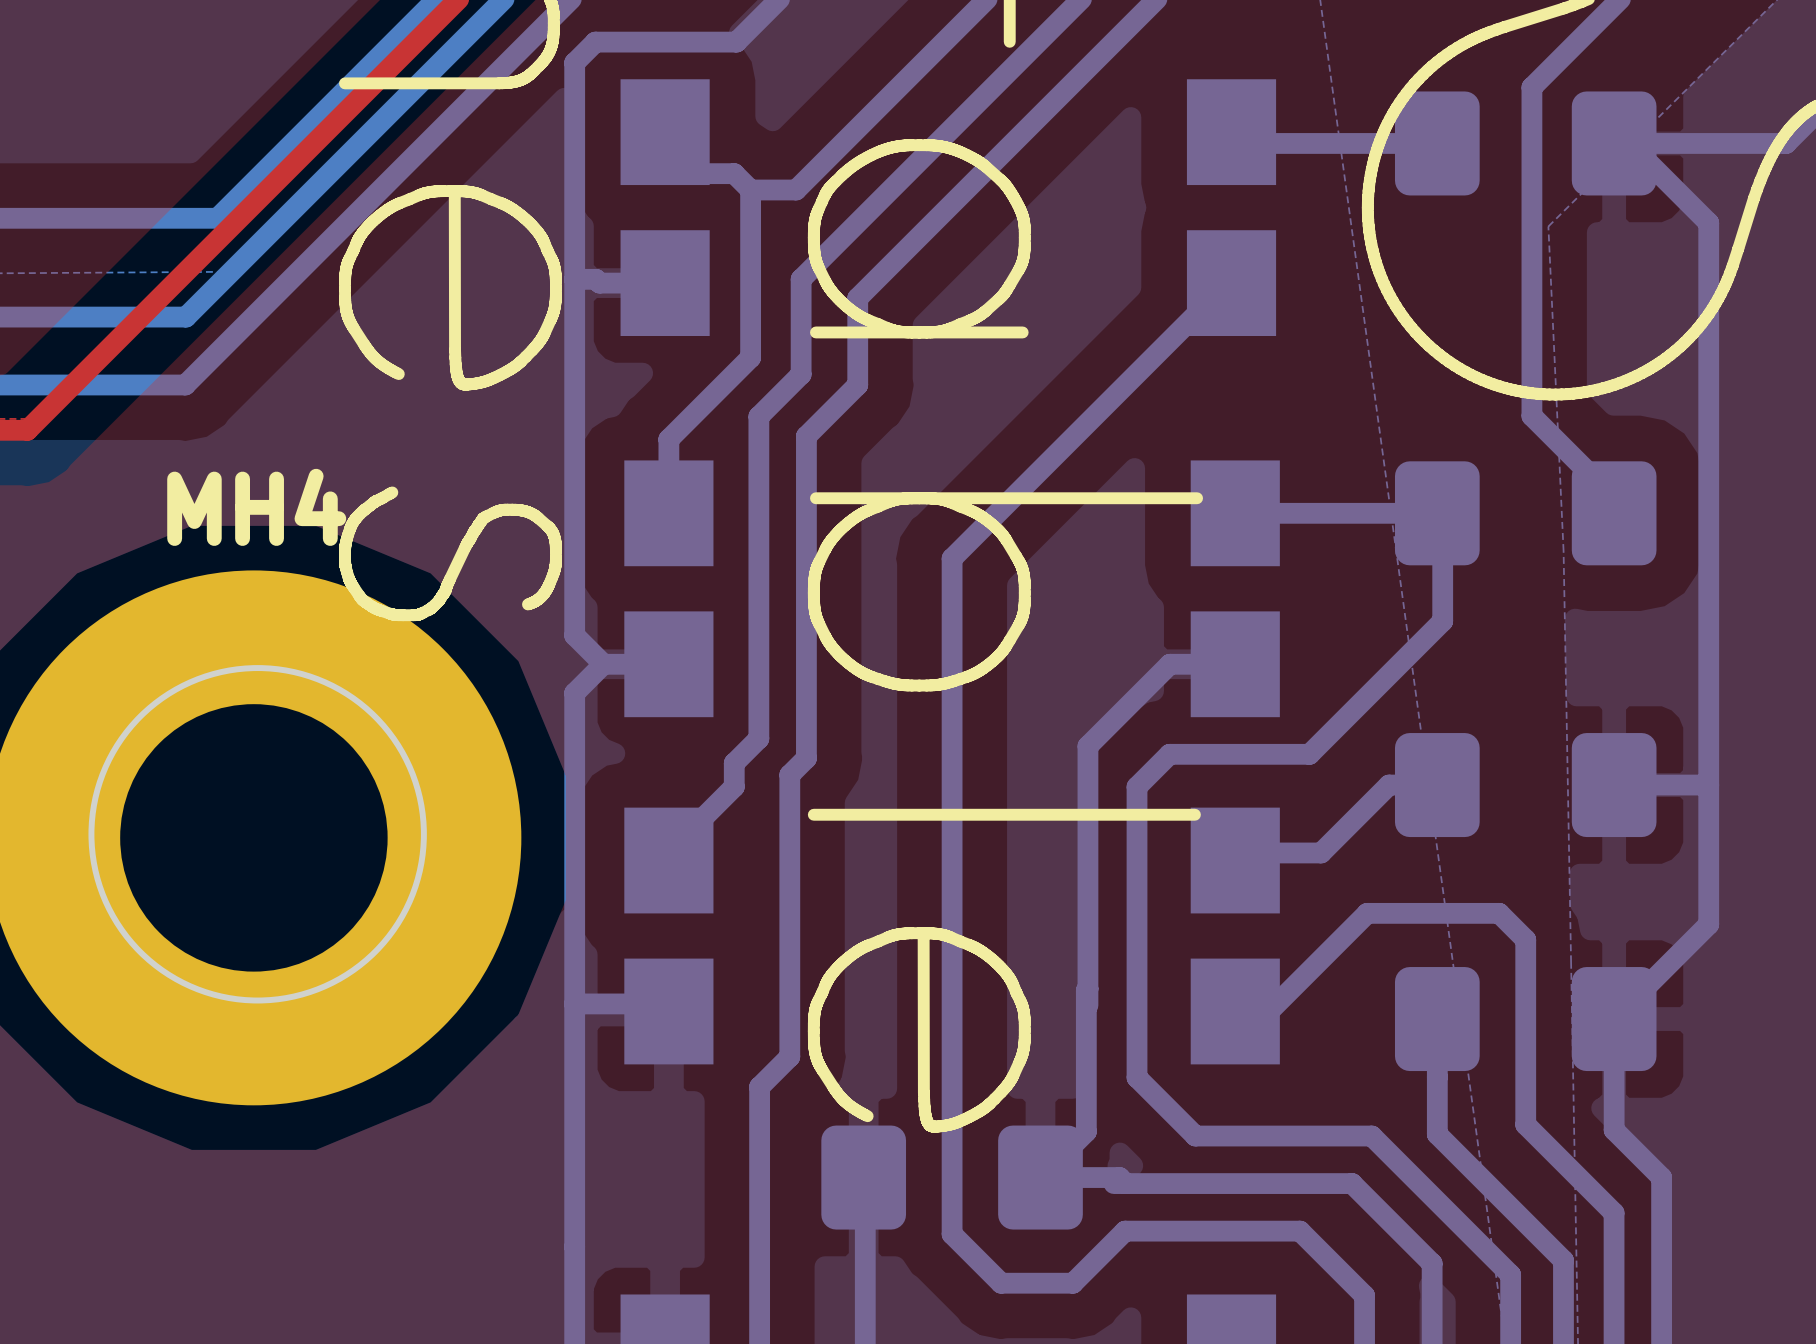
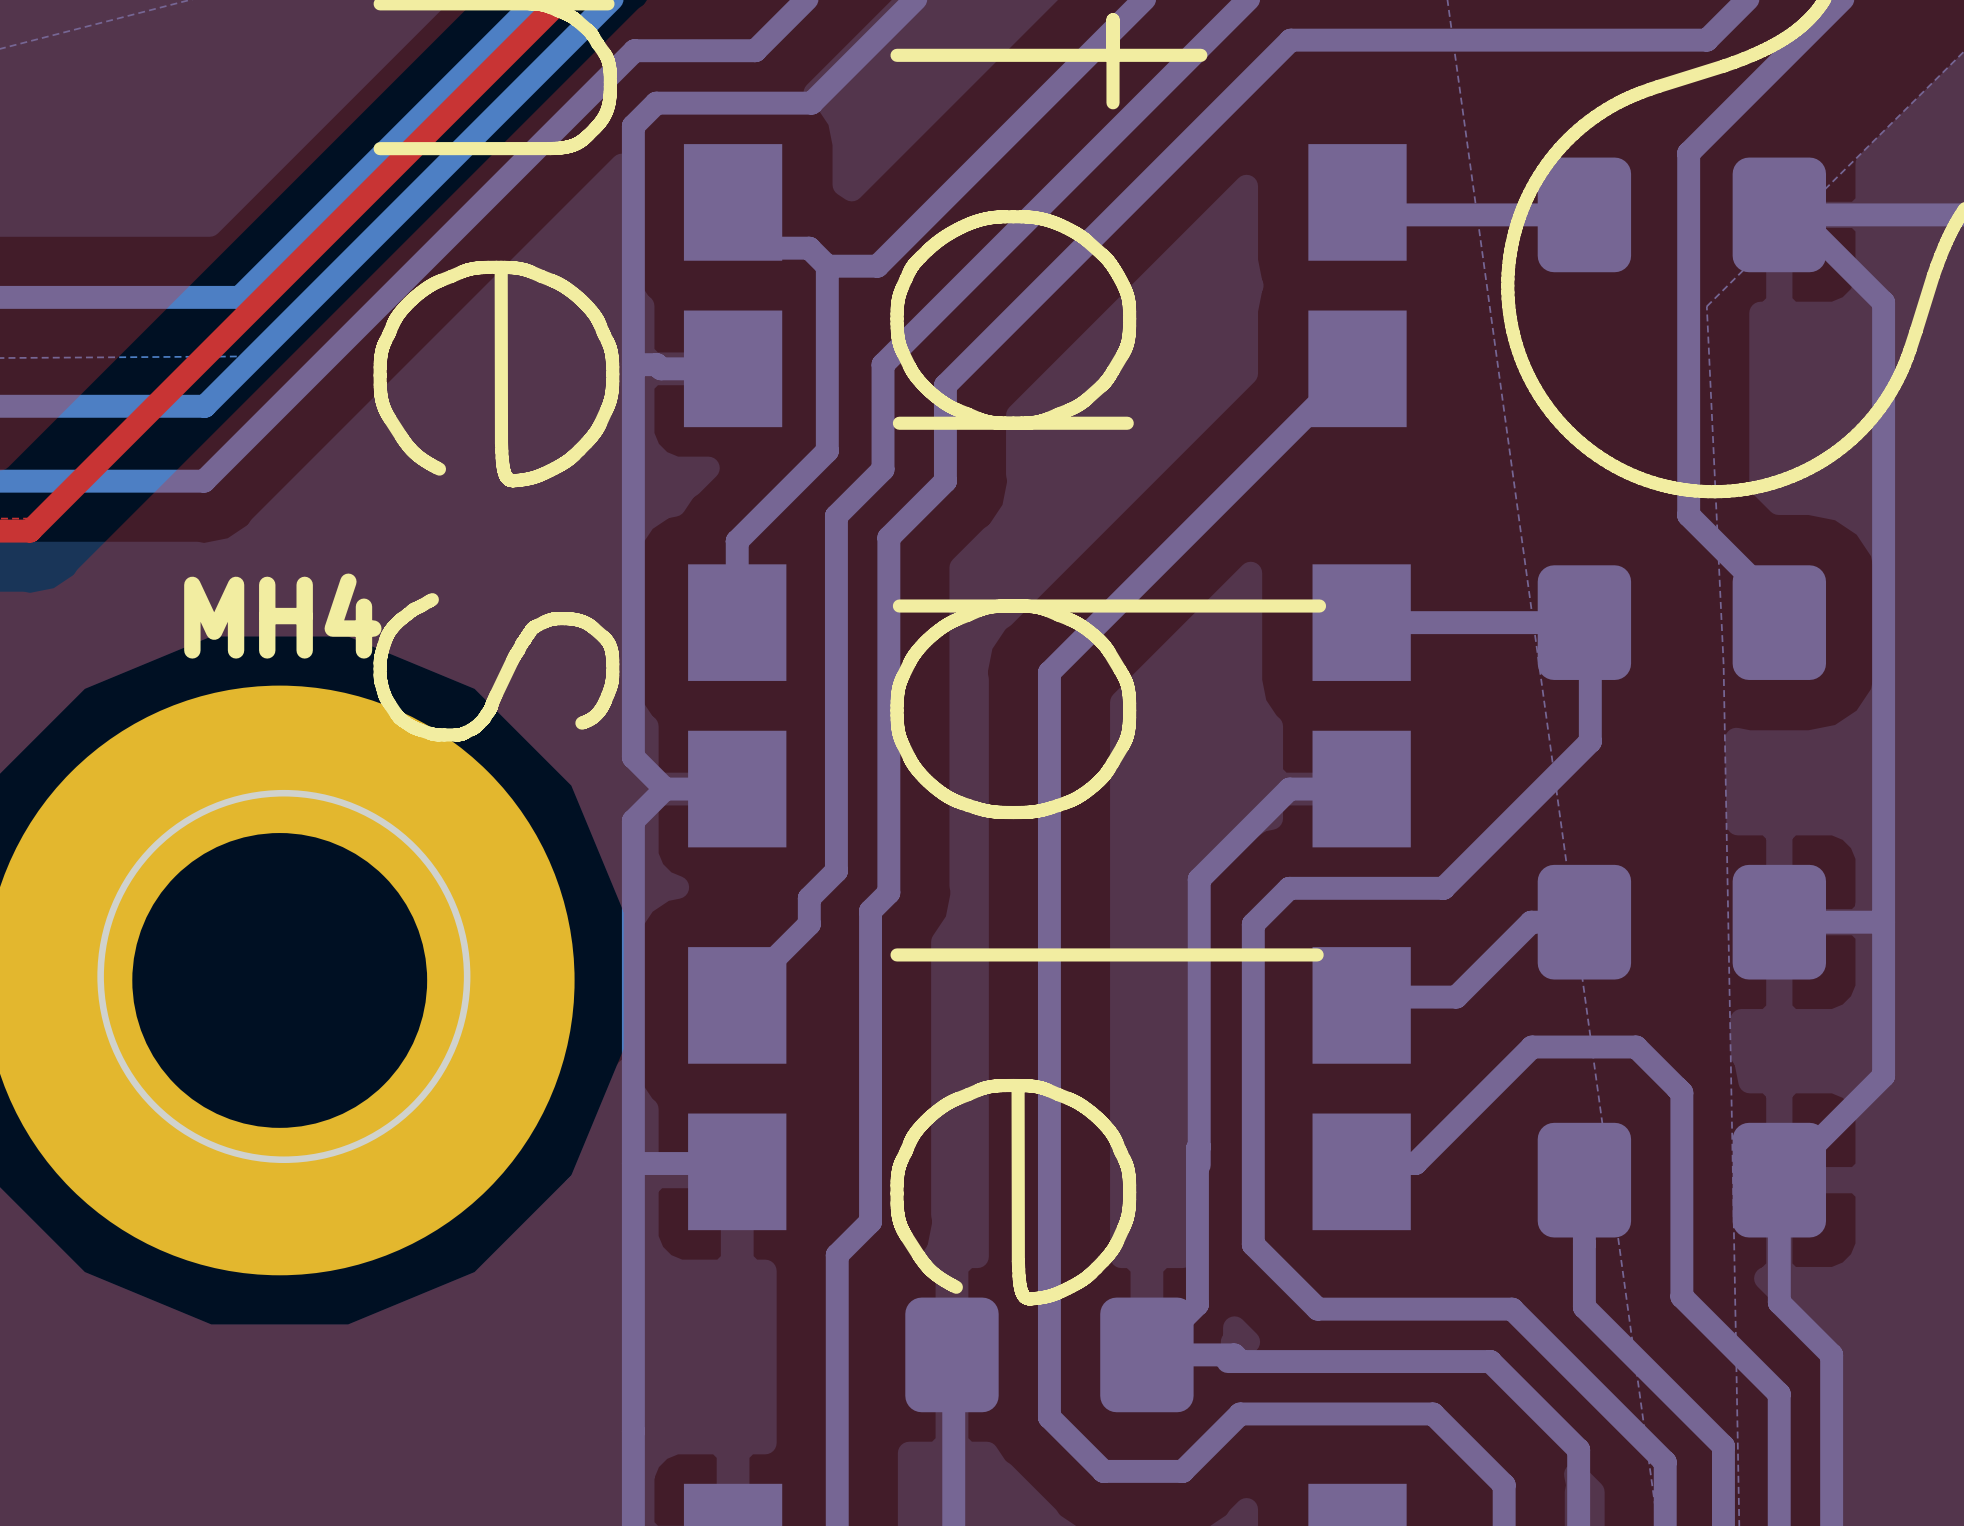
bottom track: (1499, 913) (1367, 913) (1269, 1011) (1235, 1011) -> (1652, 1063) (1636, 1047) (1532, 1047) (1415, 1163) (1361, 1163)

